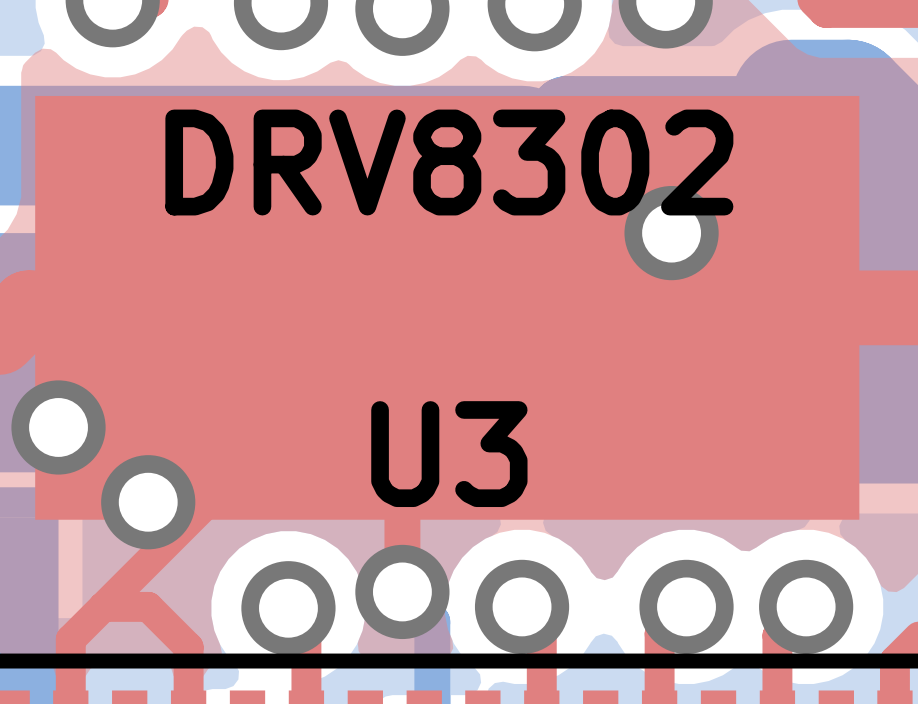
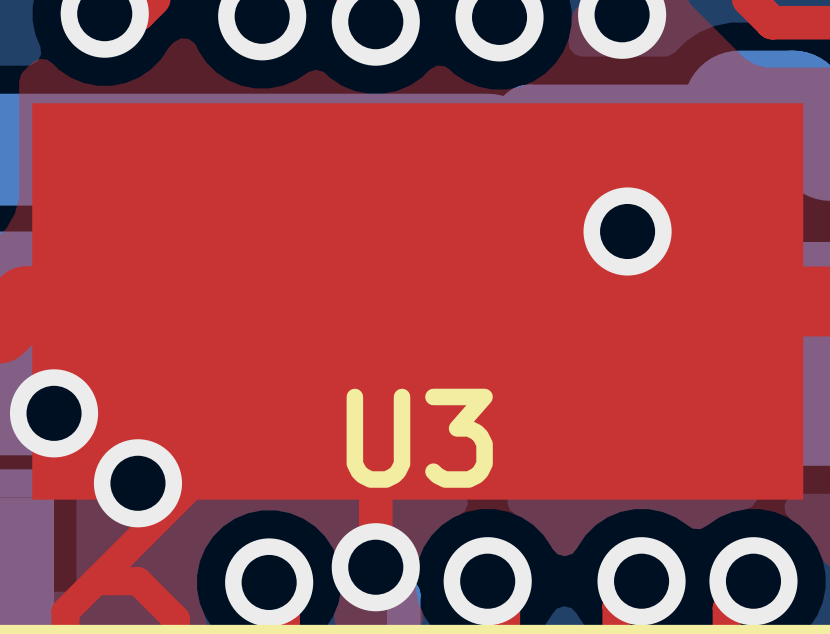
U3 value: DRV8302 (449, 162) -> none

